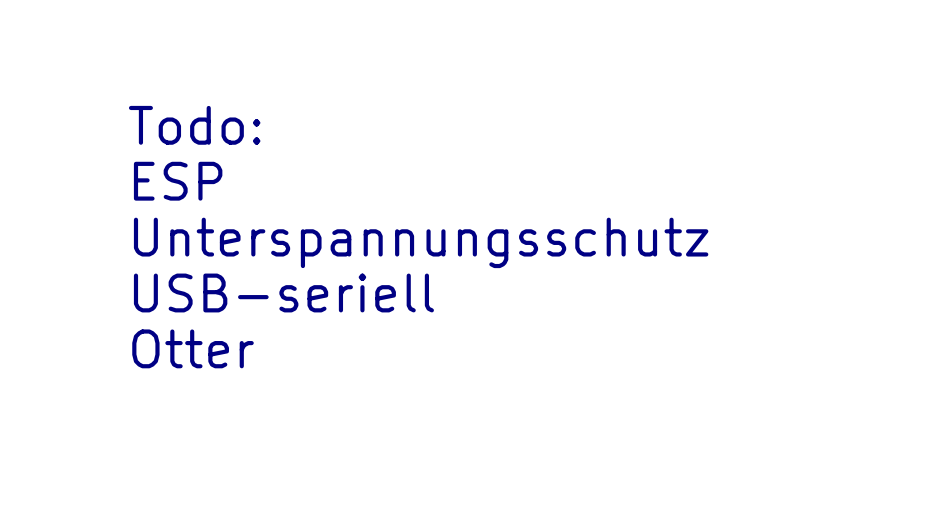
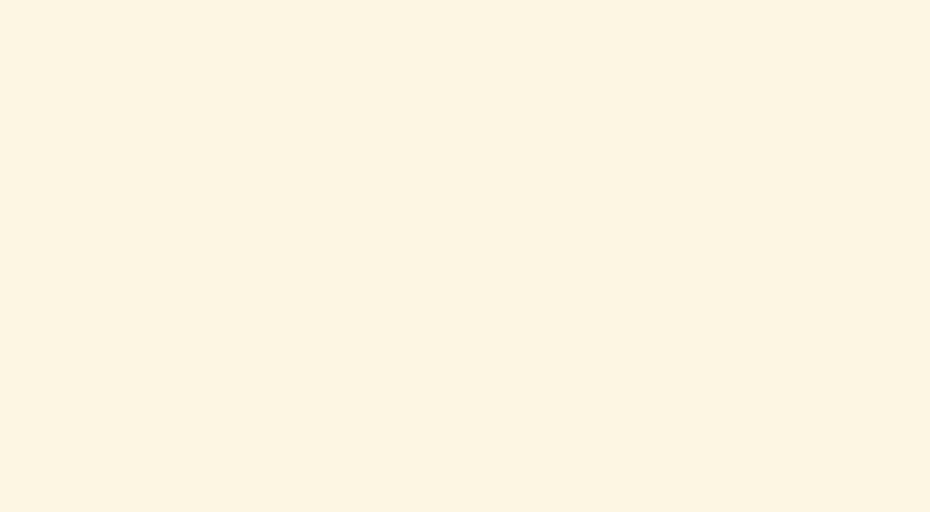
text: Todo: (194, 125) -> none
text: ESP (178, 181) -> none
text: Unterspannungsschutz (421, 242) -> none
text: USB-seriell (283, 292) -> none
text: Otter (193, 348) -> none

